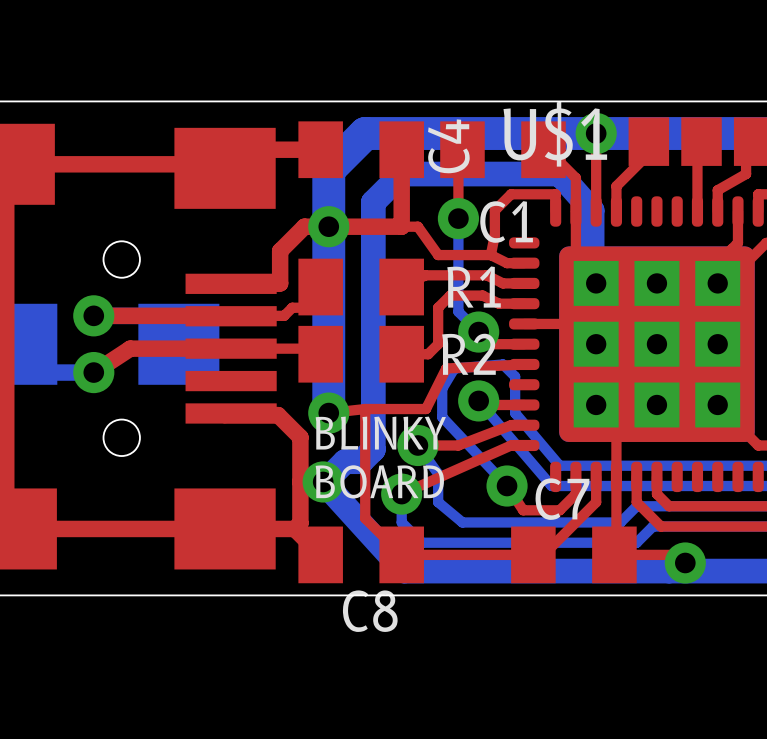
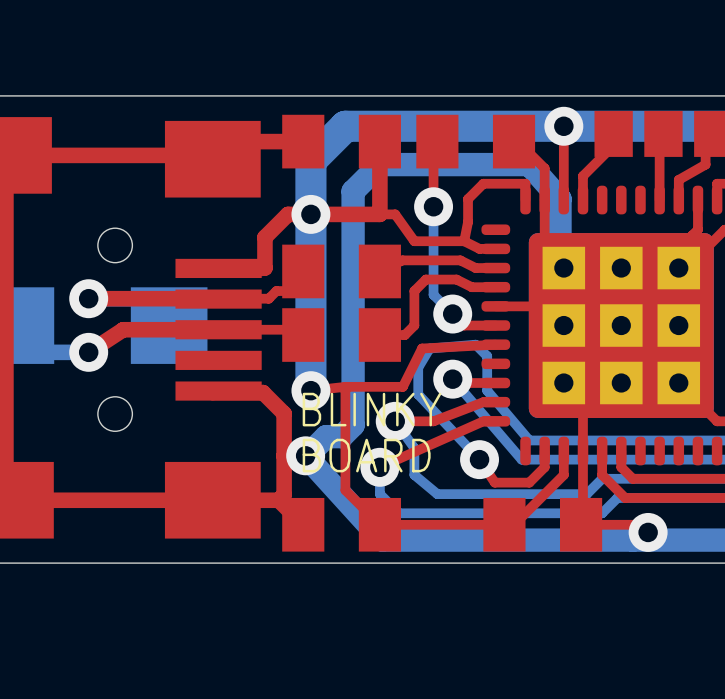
U$1 name: U$1 (555, 134) -> none
C4 name: C4 (448, 146) -> none
C1 name: C1 (506, 221) -> none
R1 name: R1 (474, 287) -> none
R2 name: R2 (468, 354) -> none
C7 name: C7 (562, 499) -> none
C8 name: C8 (370, 611) -> none

